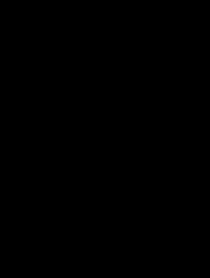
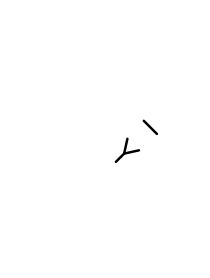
text: none -> - (150, 127)
text: none -> Y (127, 150)

